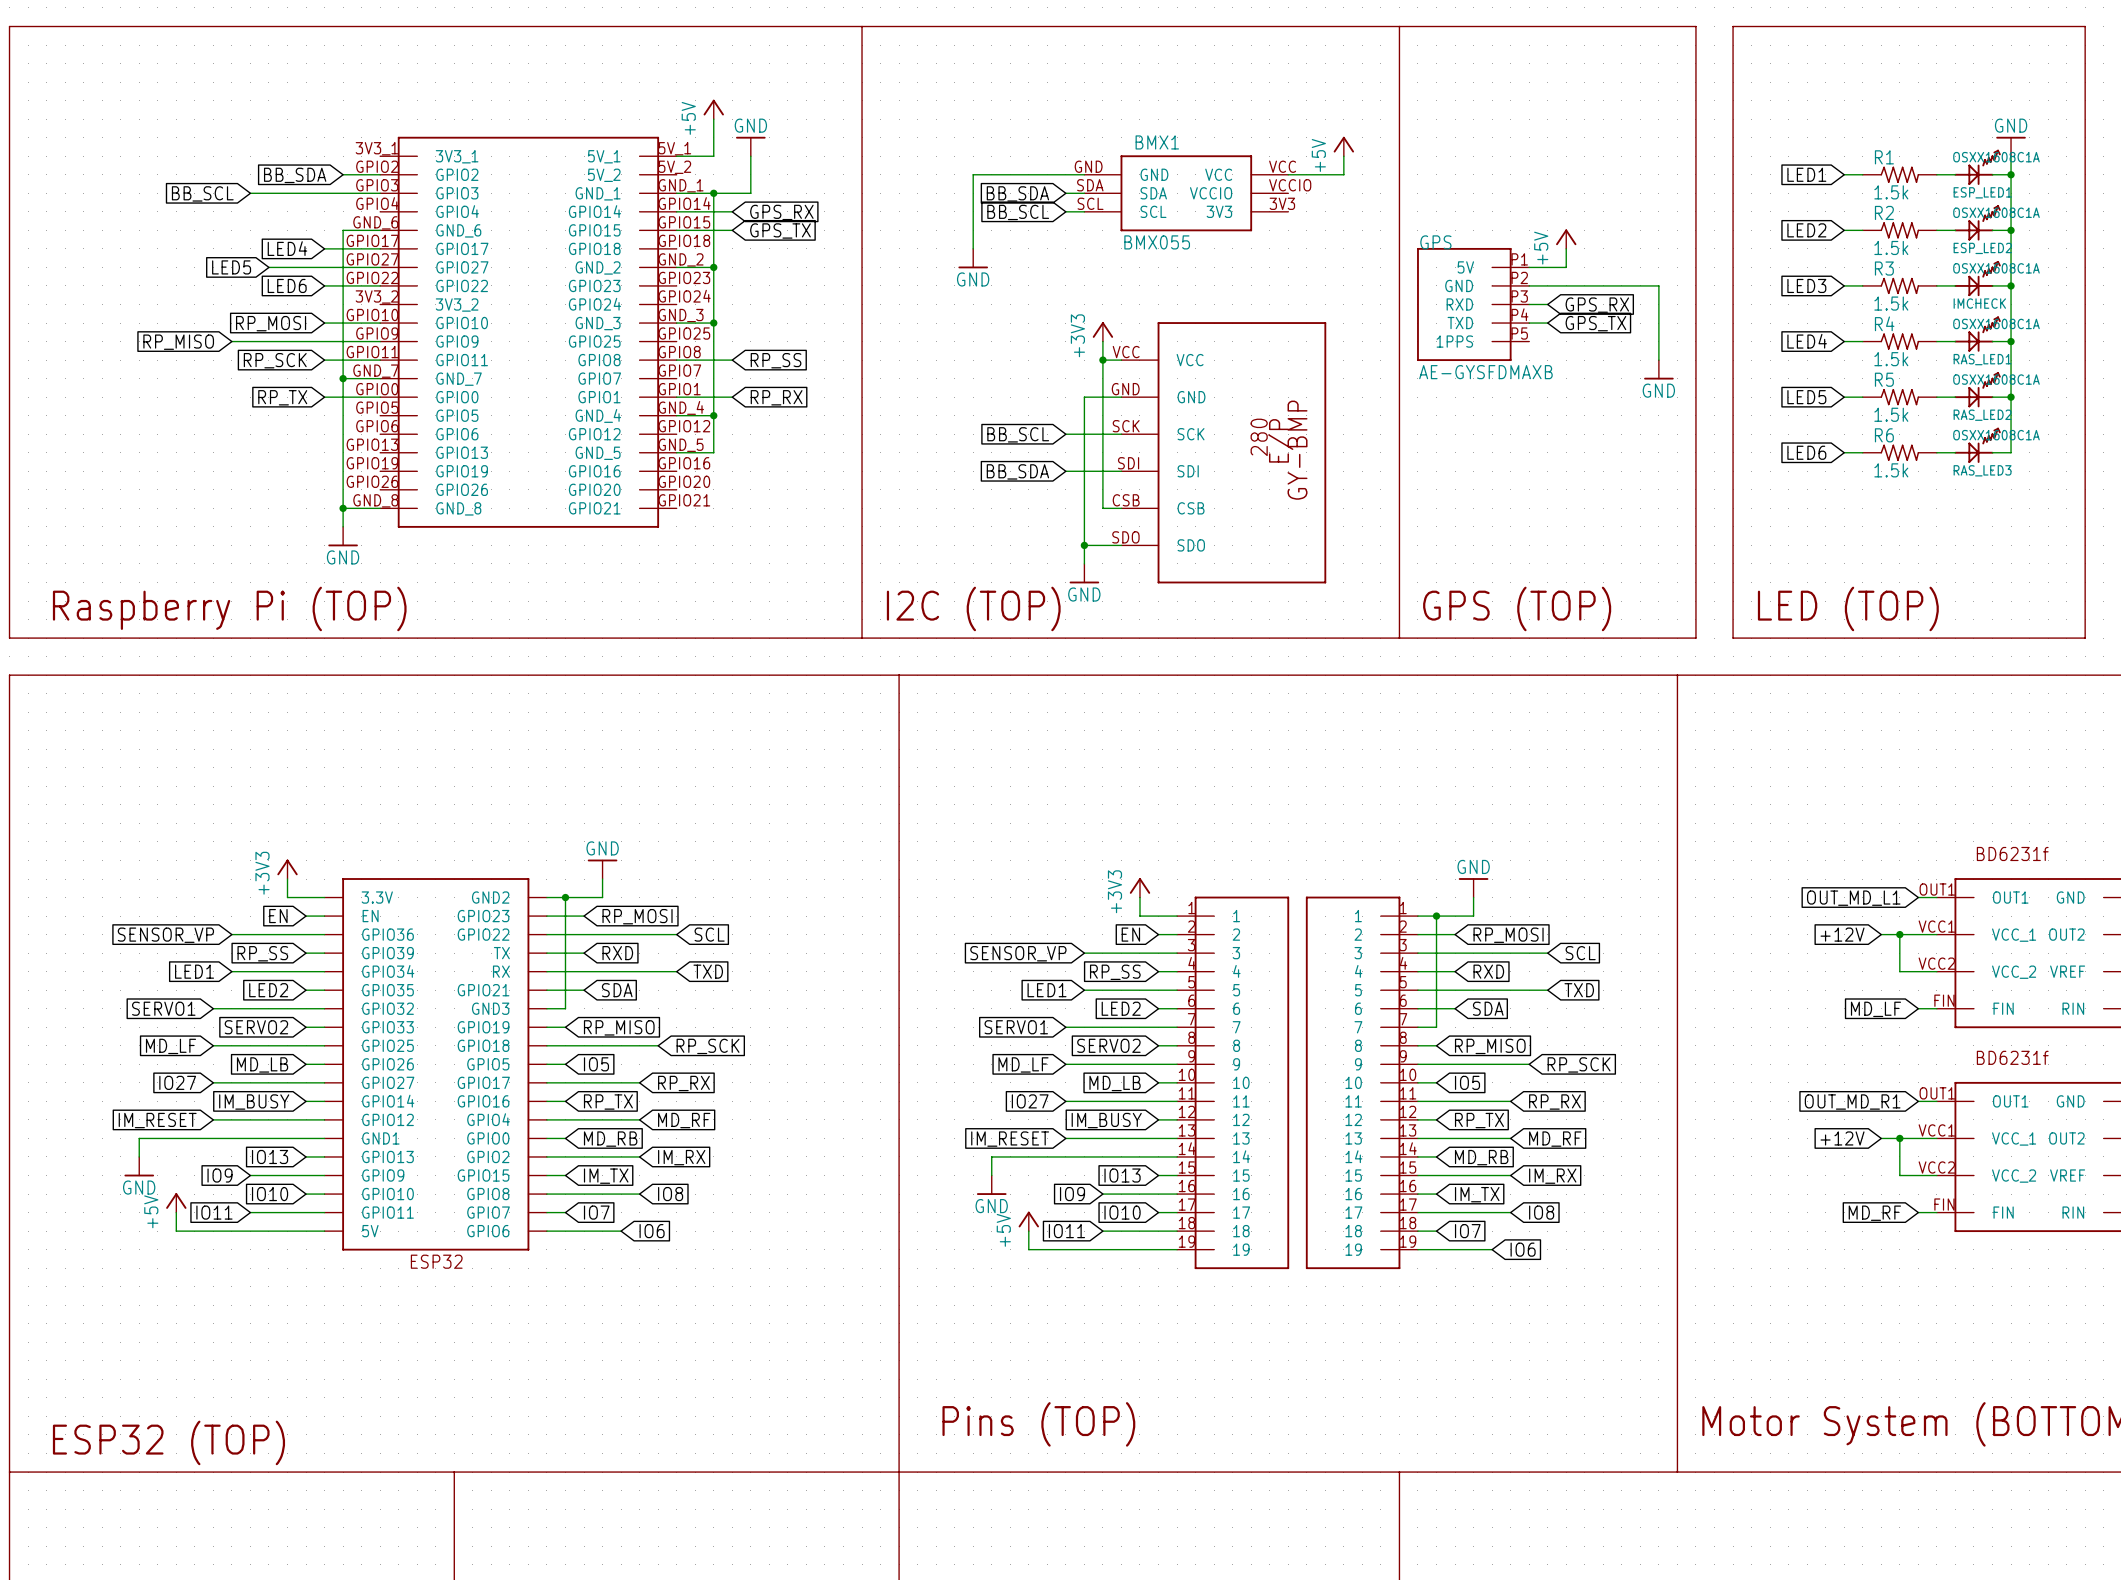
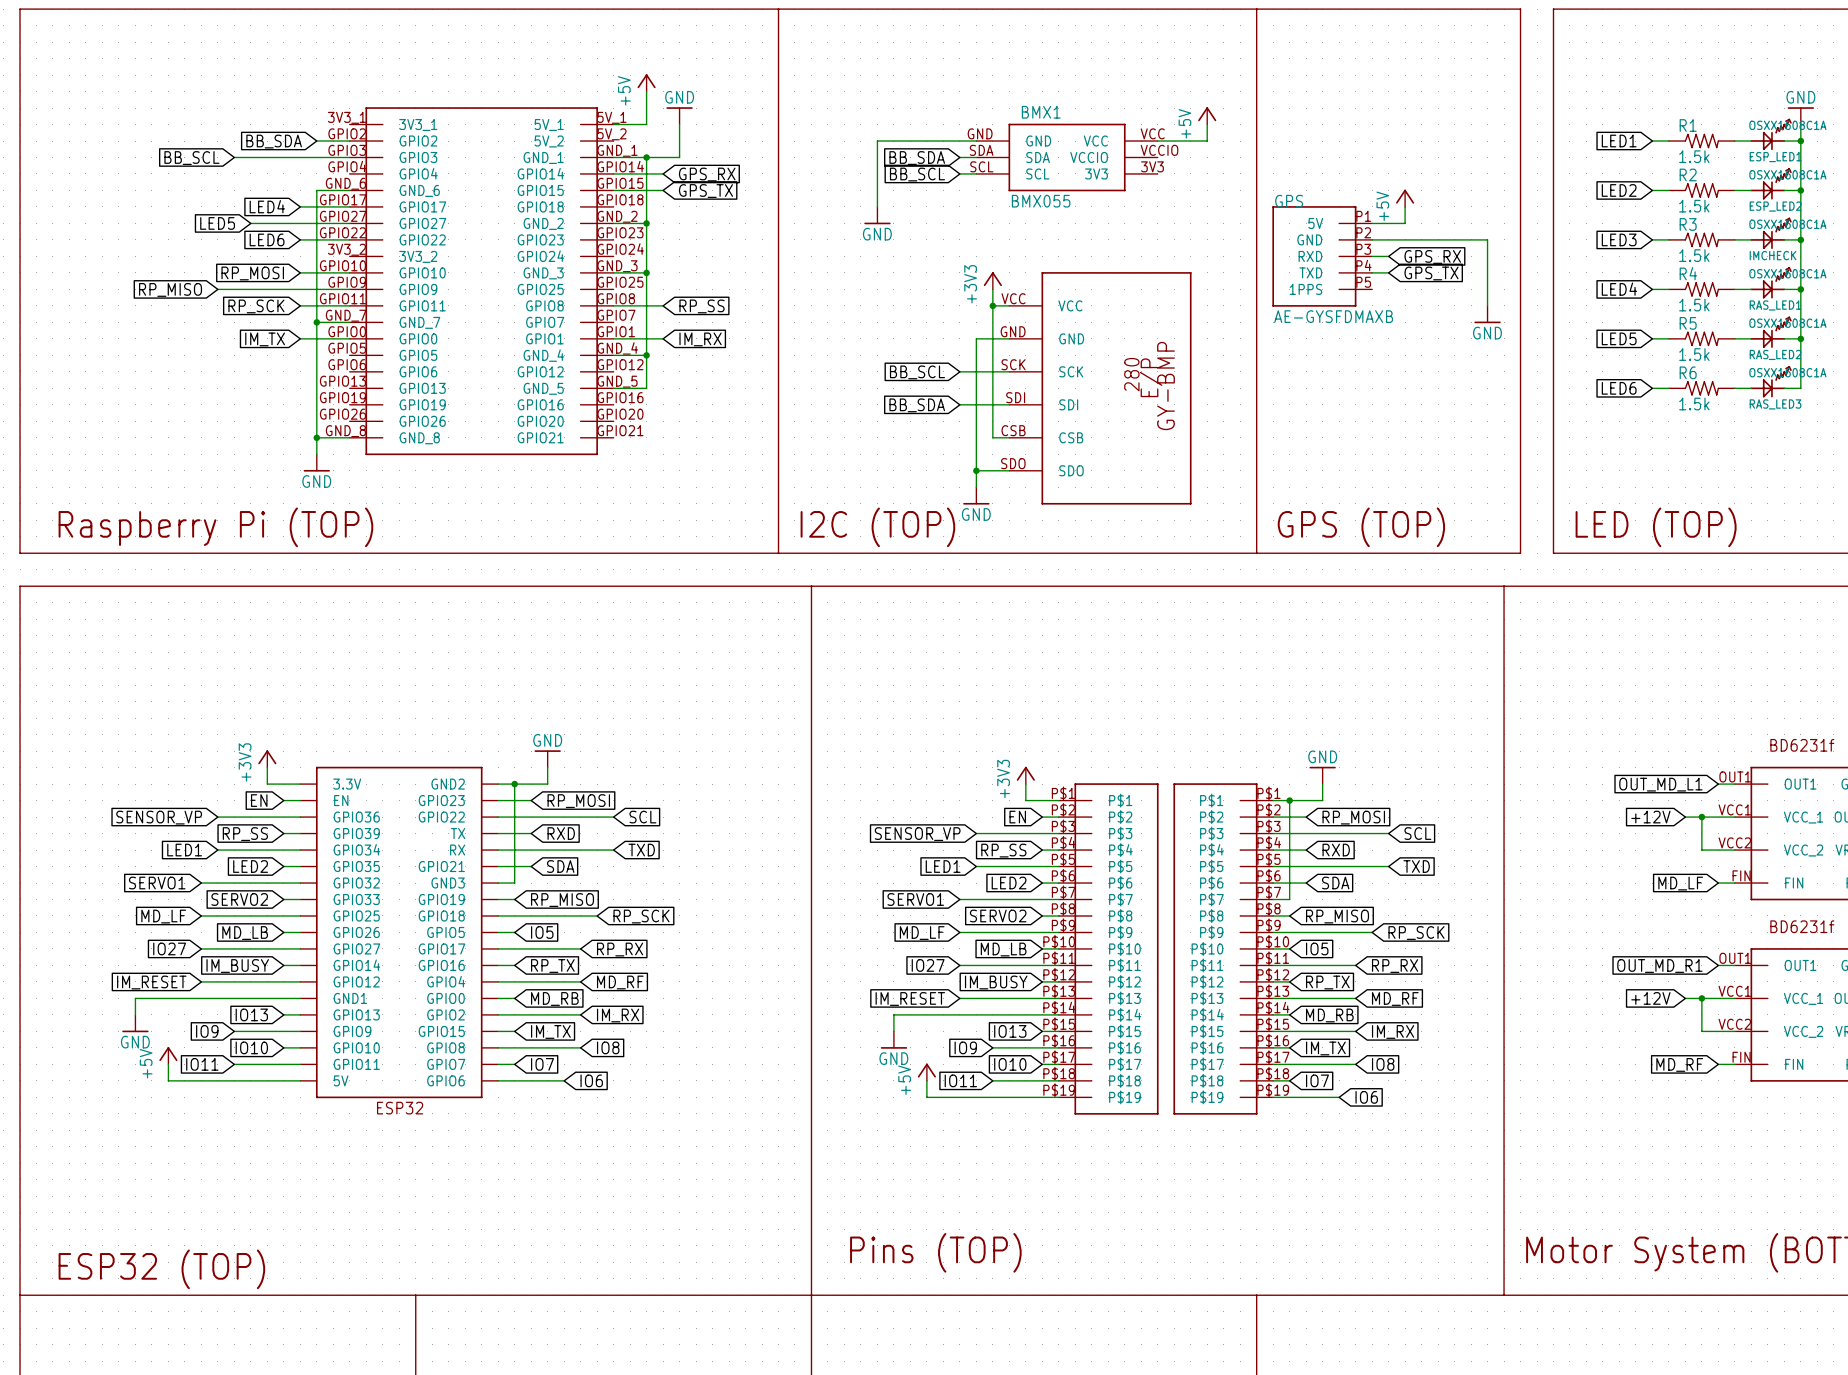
global label: RP_TX (282, 397) -> IM_TX (265, 339)
global label: RP_RX (776, 397) -> IM_RX (700, 339)
part symbol: [1177, 896, 1290, 1270] -> [1058, 783, 1159, 1115]
part symbol: [1305, 896, 1418, 1270] -> [1173, 783, 1274, 1115]

